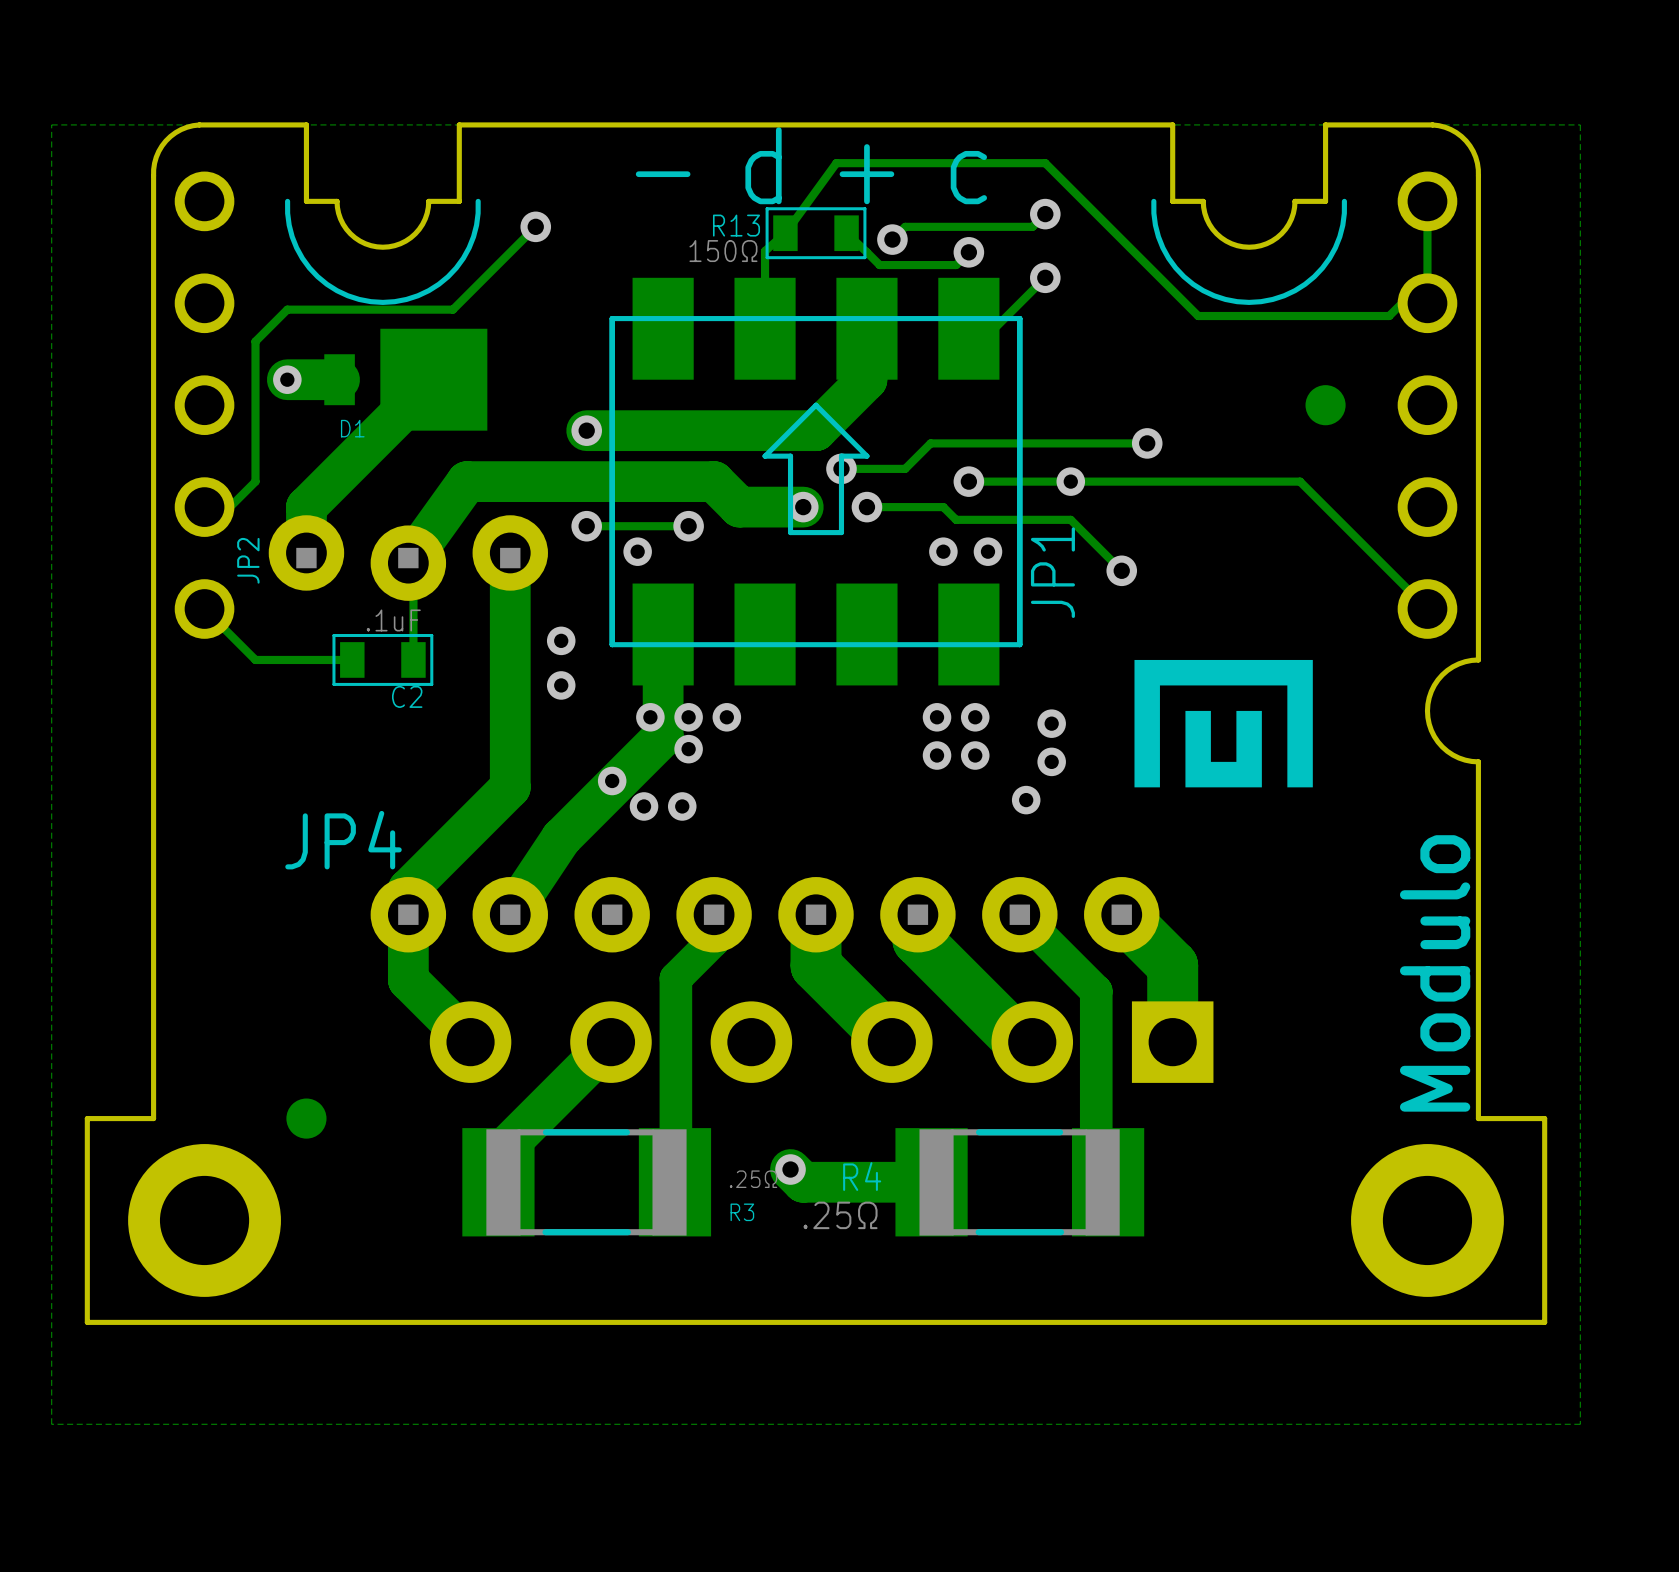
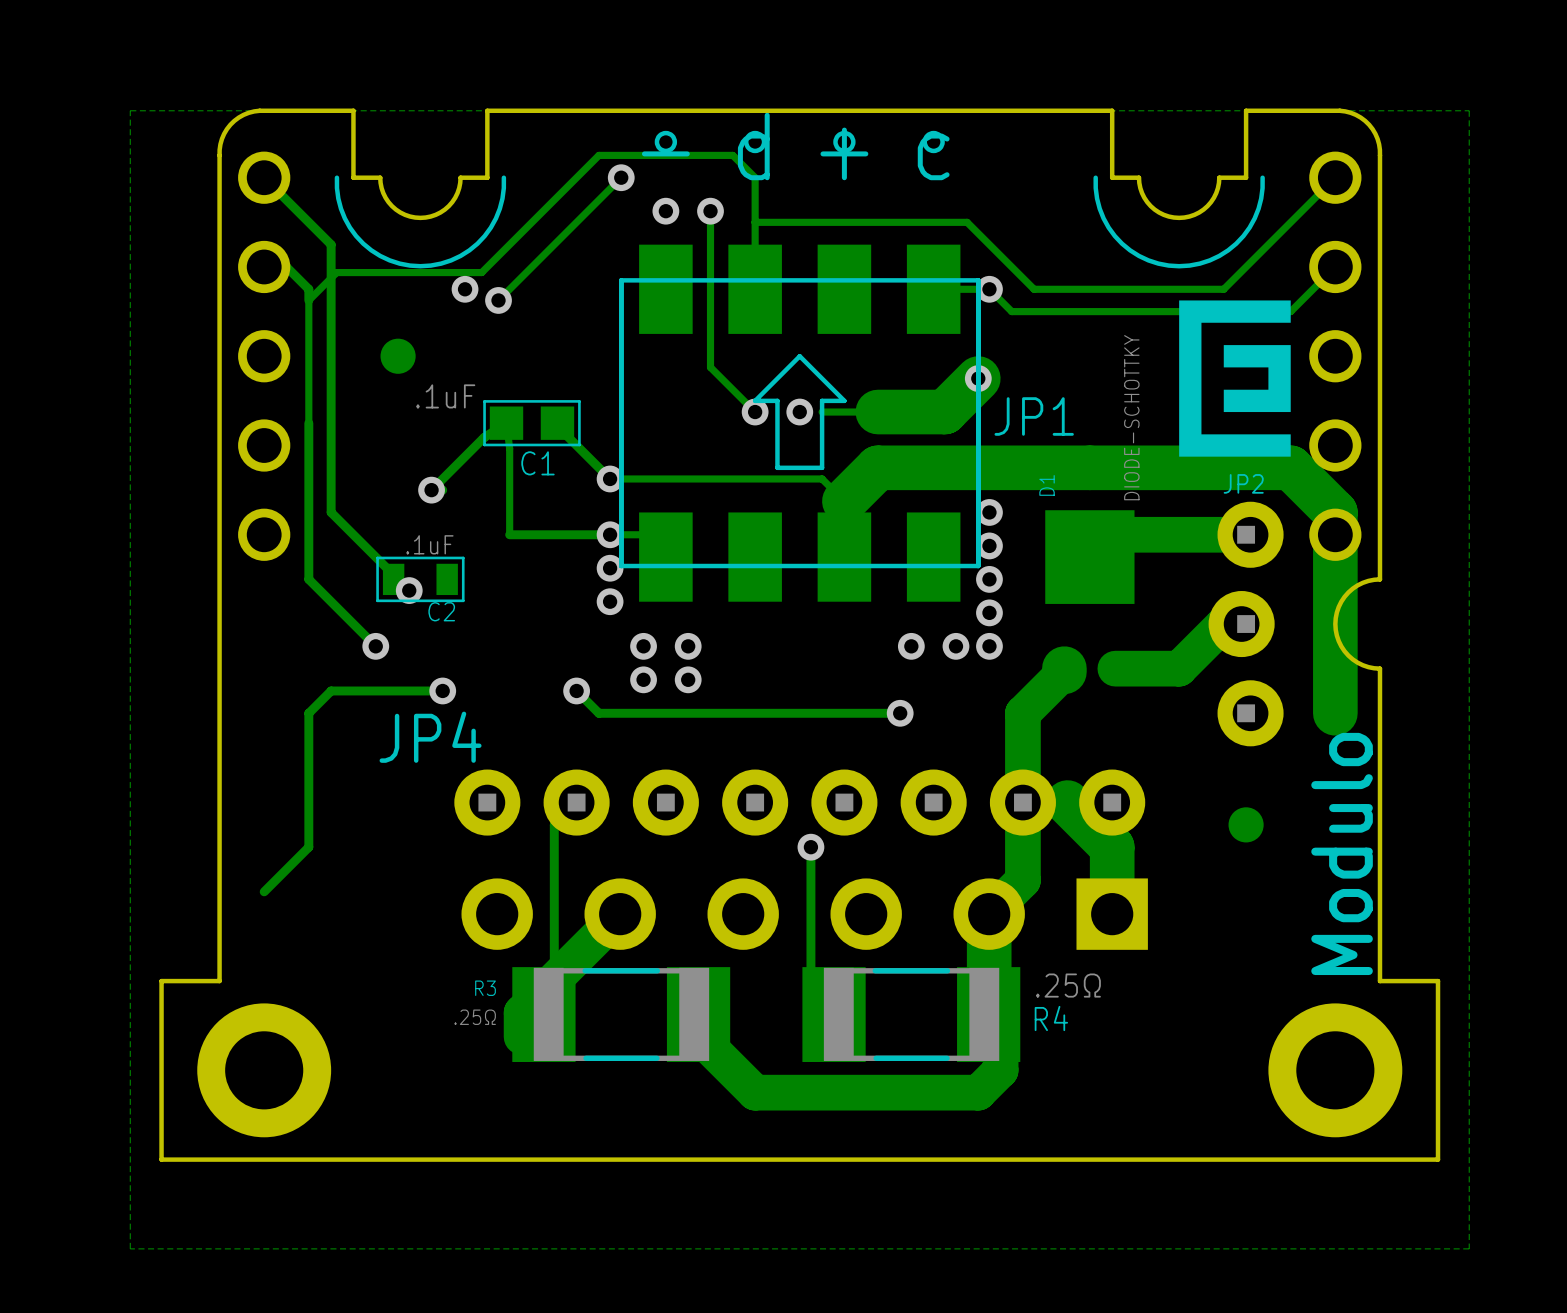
track: none -> (264, 177) (331, 244) (331, 512) (409, 590)
track: none -> (621, 177) (498, 300)
via: none -> (621, 177)
track: (1427, 201) (1427, 303) (1401, 303) (1389, 316) (1198, 316) (1045, 163) (836, 163) (785, 233) (765, 251) -> (1335, 177) (1223, 289) (1034, 289) (967, 222) (755, 222)
track: (1045, 214) (1032, 226) (905, 226) (892, 239) -> none
via: (1045, 214) -> none
track: none -> (554, 200) (598, 155) (732, 155) (755, 177) (755, 221)
via: (535, 226) -> none
R13: 150Ω (816, 233) -> none
track: (846, 233) (879, 265) (956, 265) (968, 252) -> none
via: none -> (665, 211)
track: none -> (710, 211) (710, 367) (755, 412)
via: none -> (710, 211)
via: (892, 239) -> none
via: (968, 252) -> none
JP1 footprint: [609, 277, 1023, 686] -> [619, 130, 981, 602]
track: (1045, 277) (994, 328) -> (1335, 266) (1290, 311) (1011, 311) (989, 289) (955, 289)
via: (1045, 277) -> none
track: none -> (264, 266) (286, 266) (308, 289) (308, 300)
via: none -> (465, 289)
track: (866, 328) (866, 379) (816, 430) (586, 430) -> none
via: none -> (989, 289)
via: none -> (498, 300)
drawing: none -> [1179, 300, 1291, 457]
via: (287, 379) -> none
track: (339, 379) (287, 379) -> none
D1 rotation: 0° (405, 379) -> 90° clockwise (1089, 532)
D1 position: (405, 379) -> (1089, 532)
track: (433, 379) (306, 507) (306, 552) -> none
part: none -> (398, 356)
part: (1325, 405) -> none
via: (586, 430) -> none
via: none -> (978, 378)
track: (1147, 443) (930, 443) (905, 468) -> (978, 378) (944, 412) (877, 412)
via: (1147, 443) -> none
via: none -> (755, 412)
via position: (841, 468) -> (799, 412)
D1 value: none -> DIODE-SCHOTTKY (1131, 417)
track: (255, 481) (230, 507) (204, 507) -> (308, 423) (308, 579) (375, 646)
C1: none -> .1uF (531, 423)
track: (535, 481) (466, 481) (408, 563) (413, 568) (413, 659) -> (554, 423) (610, 478) (822, 478) (844, 501)
track: (539, 481) (714, 481) (739, 507) (803, 507) -> none
track: (968, 481) (1300, 481) (1427, 609) -> none
via: (968, 481) -> none
via: (1070, 481) -> none
via: (803, 507) -> none
track: (866, 507) (943, 507) (956, 519) (1070, 519) (1121, 570) -> none
via: (866, 507) -> none
via position: (586, 526) -> (610, 478)
track: (688, 526) (586, 526) -> none
via: (688, 526) -> none
via: (637, 551) -> none
via: (943, 551) -> none
via: (987, 551) -> none
track: (510, 552) (510, 787) (408, 889) (408, 979) (470, 1042) -> none
via: none -> (431, 490)
JP2 rotation: 0° (408, 558) -> 90° clockwise (1246, 624)
JP2 position: (408, 558) -> (1246, 624)
track: none -> (844, 501) (877, 467) (1290, 467) (1335, 512) (1335, 713)
via: (1121, 570) -> none
via: none -> (989, 512)
track: (204, 609) (255, 659) (352, 659) -> none
via: none -> (610, 534)
track: none -> (1250, 534) (1105, 534) (1089, 557)
via: none -> (989, 545)
track: (663, 634) (663, 736) (561, 838) (510, 914) -> (665, 557) (643, 534) (509, 534) (509, 448) (506, 423) (484, 437) (431, 490) (442, 490)
via: (561, 640) -> none
via: none -> (610, 568)
via: none -> (989, 579)
drawing: [1134, 659, 1313, 788] -> none
via: none -> (409, 590)
via: (561, 685) -> none
via: none -> (610, 601)
via: none -> (989, 612)
track: none -> (1241, 624) (1223, 624) (1179, 668) (1115, 668)
via position: (650, 717) -> (643, 646)
via: (688, 717) -> none
via: (726, 717) -> none
via: (937, 717) -> none
via: (975, 717) -> none
via: (1051, 723) -> none
via: none -> (375, 646)
via: none -> (688, 646)
via: none -> (911, 646)
via: none -> (955, 646)
via: none -> (989, 646)
via: (688, 749) -> none
via: (937, 755) -> none
via: (975, 755) -> none
via: (1051, 761) -> none
track: none -> (1064, 668) (1064, 671) (1022, 713) (1022, 880) (989, 914) (988, 1014) (1000, 1026) (1000, 1070) (978, 1092) (755, 1092) (698, 1036) (698, 1014)
via: none -> (688, 679)
via position: (612, 780) -> (643, 679)
track: none -> (442, 690) (331, 690) (308, 713) (308, 847) (264, 891)
via: none -> (442, 690)
track: none -> (576, 690) (598, 713) (900, 713)
via: none -> (576, 690)
via: (1026, 800) -> none
via: (644, 806) -> none
via: (682, 806) -> none
via: none -> (900, 713)
track: none -> (576, 802) (554, 824) (554, 1004) (543, 1014)
track: (714, 914) (714, 940) (675, 978) (674, 1182) (682, 1174) -> none
JP4 position: (765, 914) -> (799, 802)
track: (816, 914) (816, 965) (891, 1041) -> none
track: (917, 914) (917, 940) (1019, 1042) (1032, 1042) -> none
track: (1019, 914) (1096, 991) (1096, 1170) (1108, 1182) -> none
part: none -> (1246, 824)
track: none -> (810, 847) (810, 991) (834, 1014)
via: none -> (810, 847)
part: (306, 1118) -> none
track: (790, 1169) (803, 1182) (931, 1182) -> none
via: (790, 1169) -> none
R3 rotation: 0° (586, 1182) -> 180° (621, 1014)
R4 rotation: 0° (1019, 1182) -> 180° (911, 1014)

